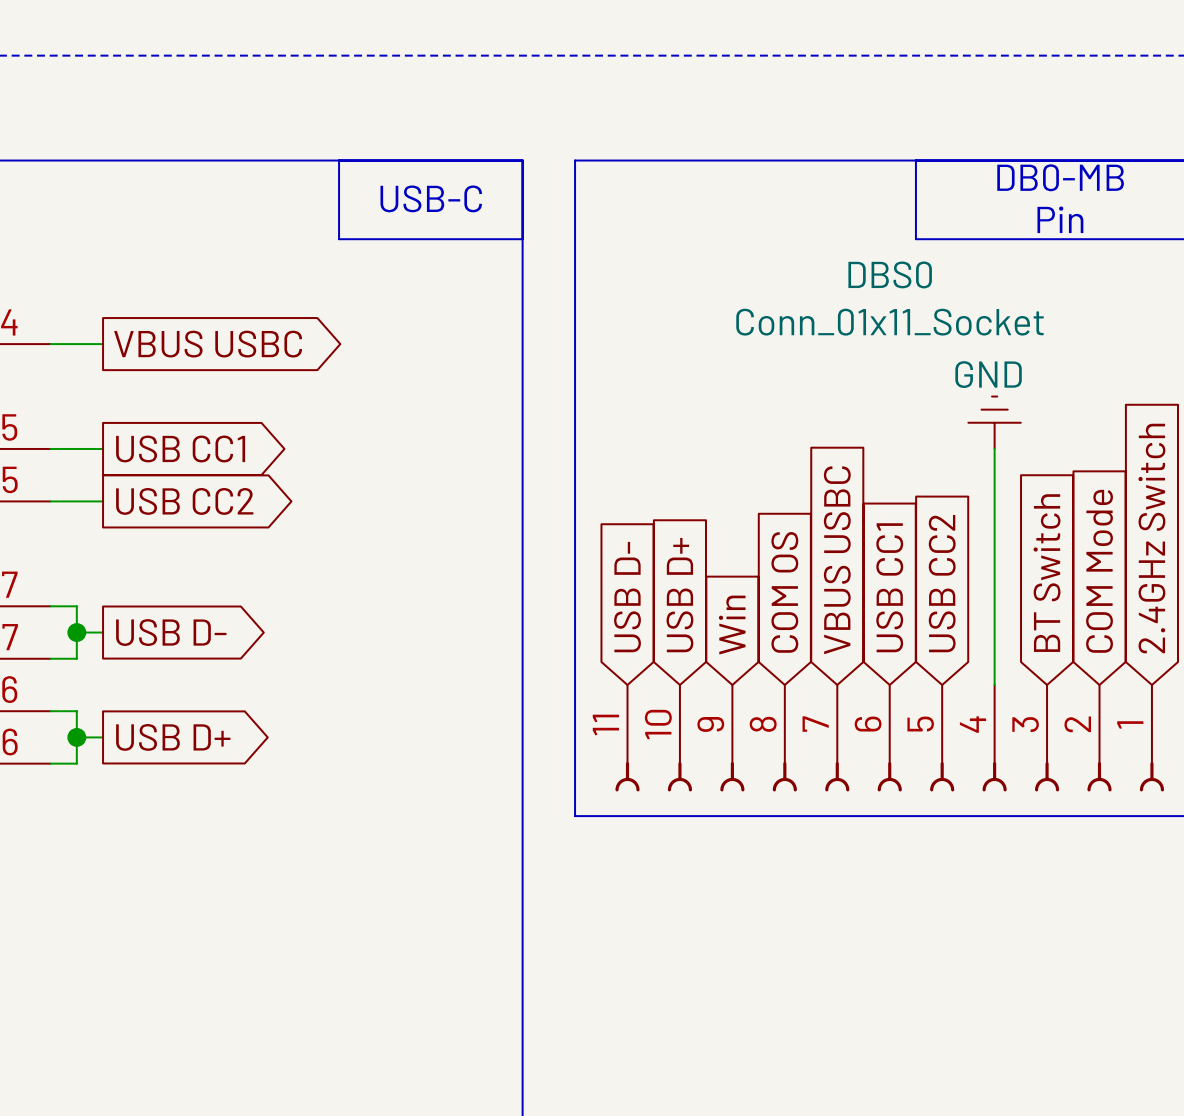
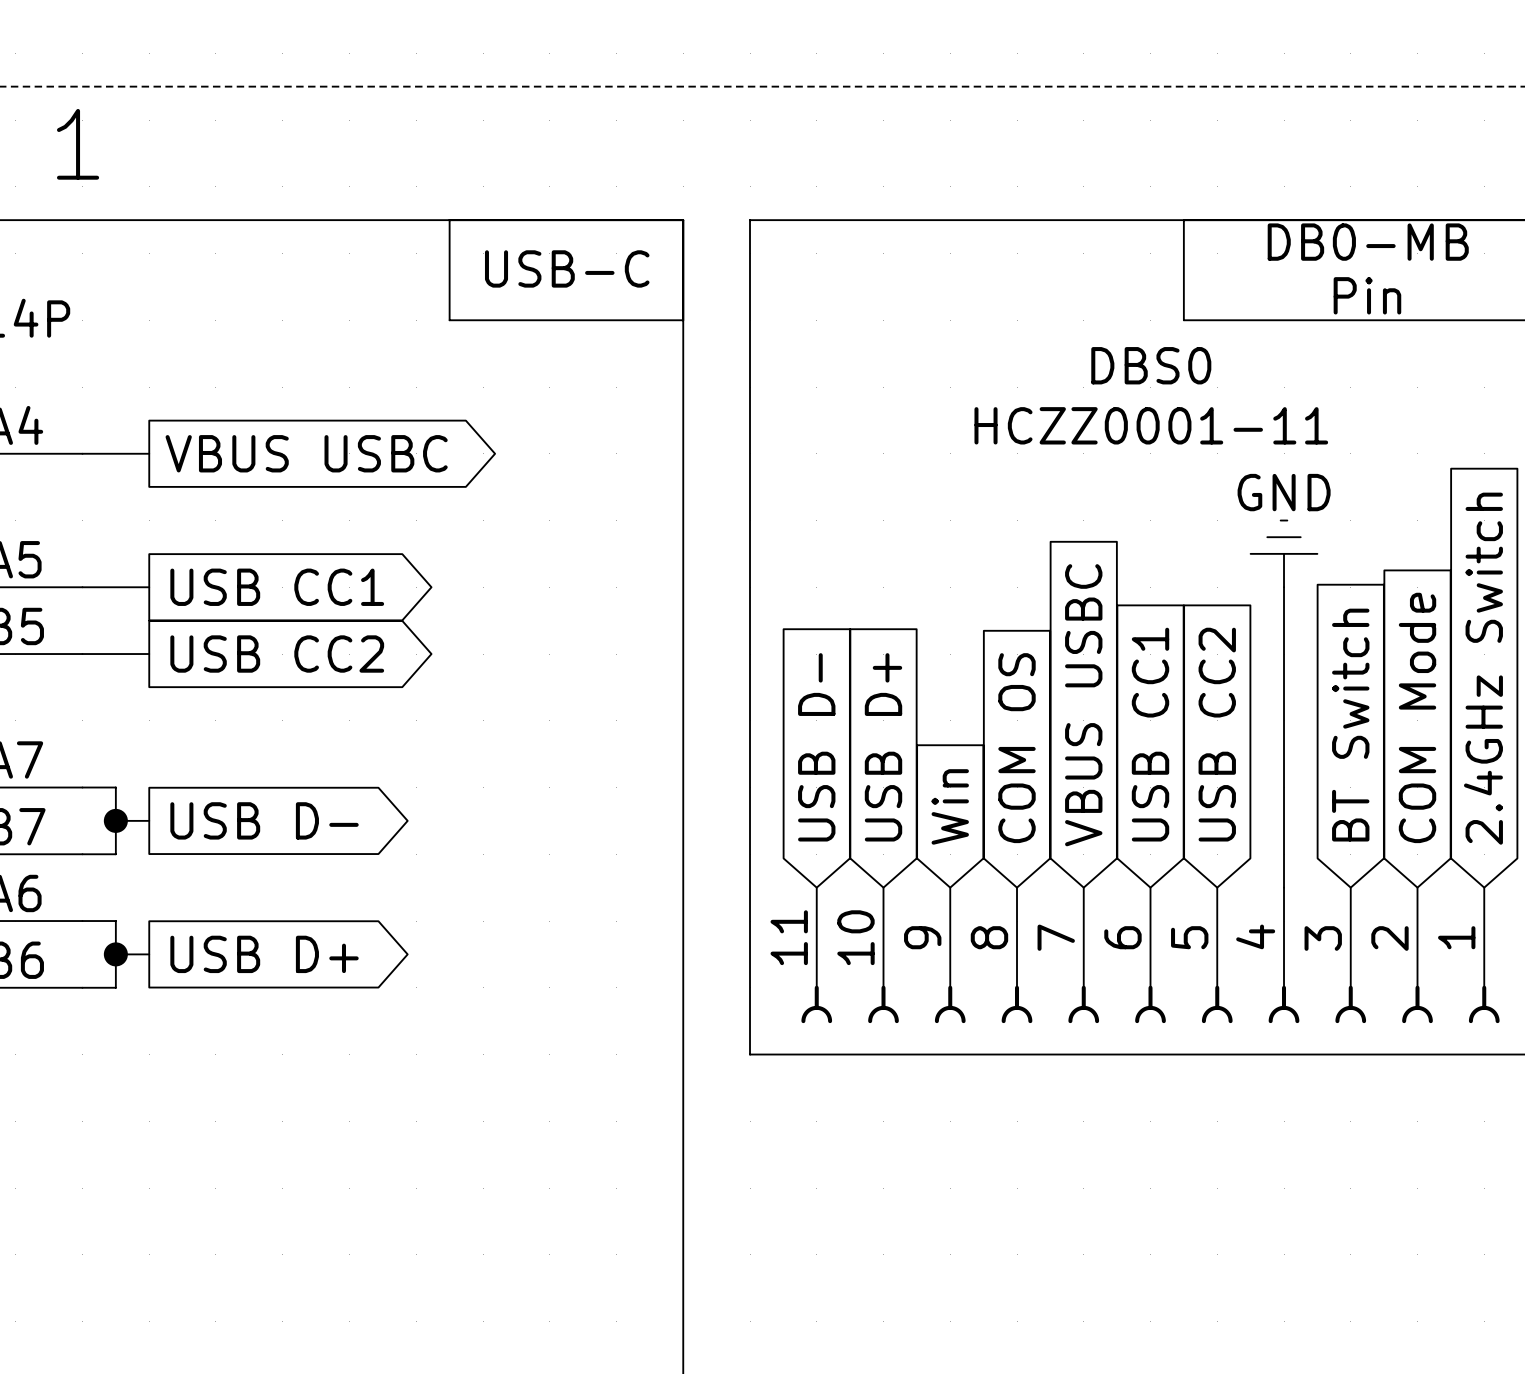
DBS0 value: Conn_01x11_Socket (890, 322) -> HCZZ0001-11 (1151, 425)

